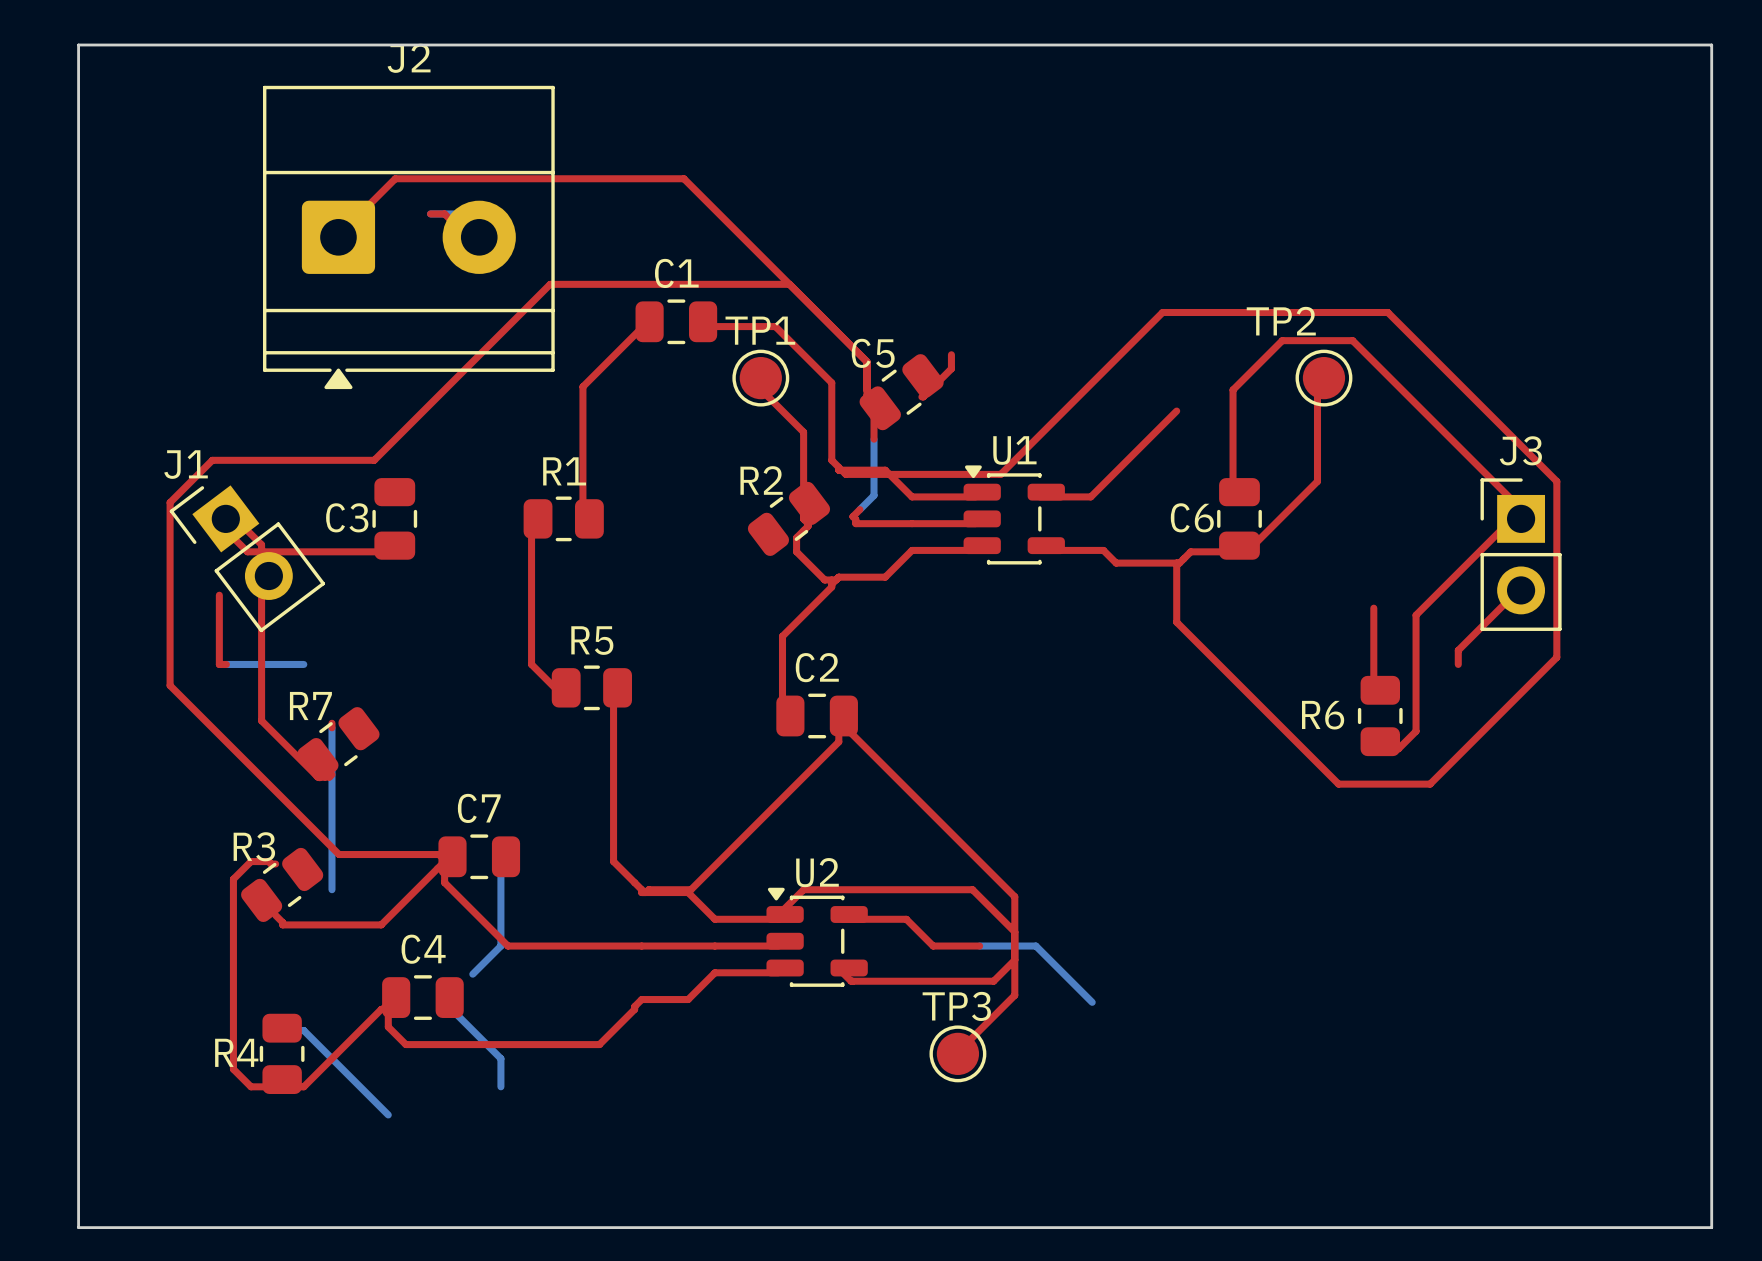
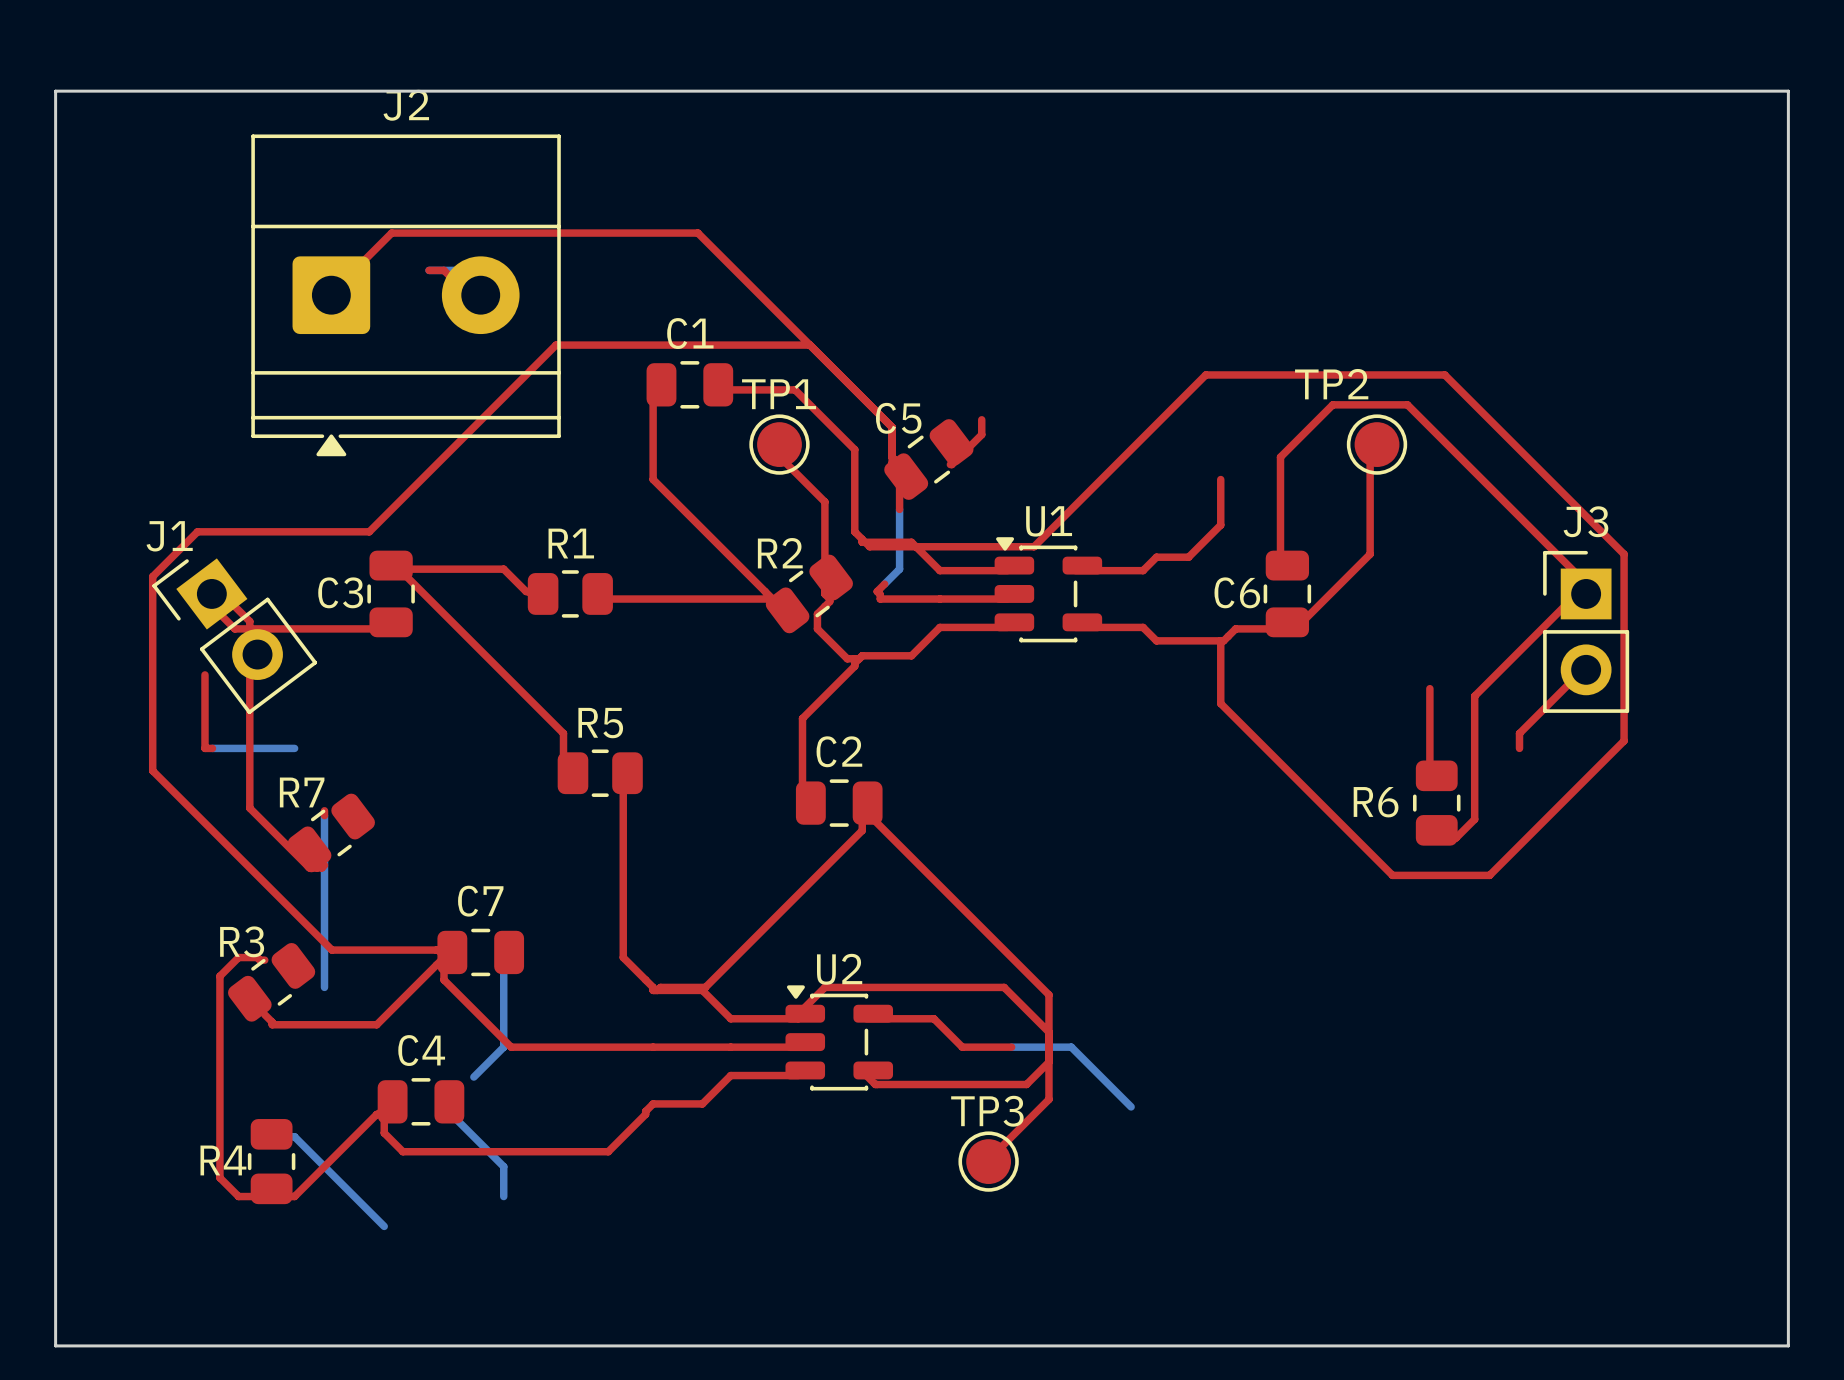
top track: (641, 327) (582, 386) (582, 523) -> (653, 391) (653, 479) (772, 599)
top track: (1176, 411) (1090, 496) -> (1220, 479) (1220, 525) (1188, 557) (1156, 557) (1143, 570) (1129, 570)
top track: none -> (384, 570) (503, 569) (536, 599)
top track: (531, 523) (531, 664) (557, 690) -> (399, 569) (563, 733) (563, 775)
top track: none -> (590, 599) (775, 599)

